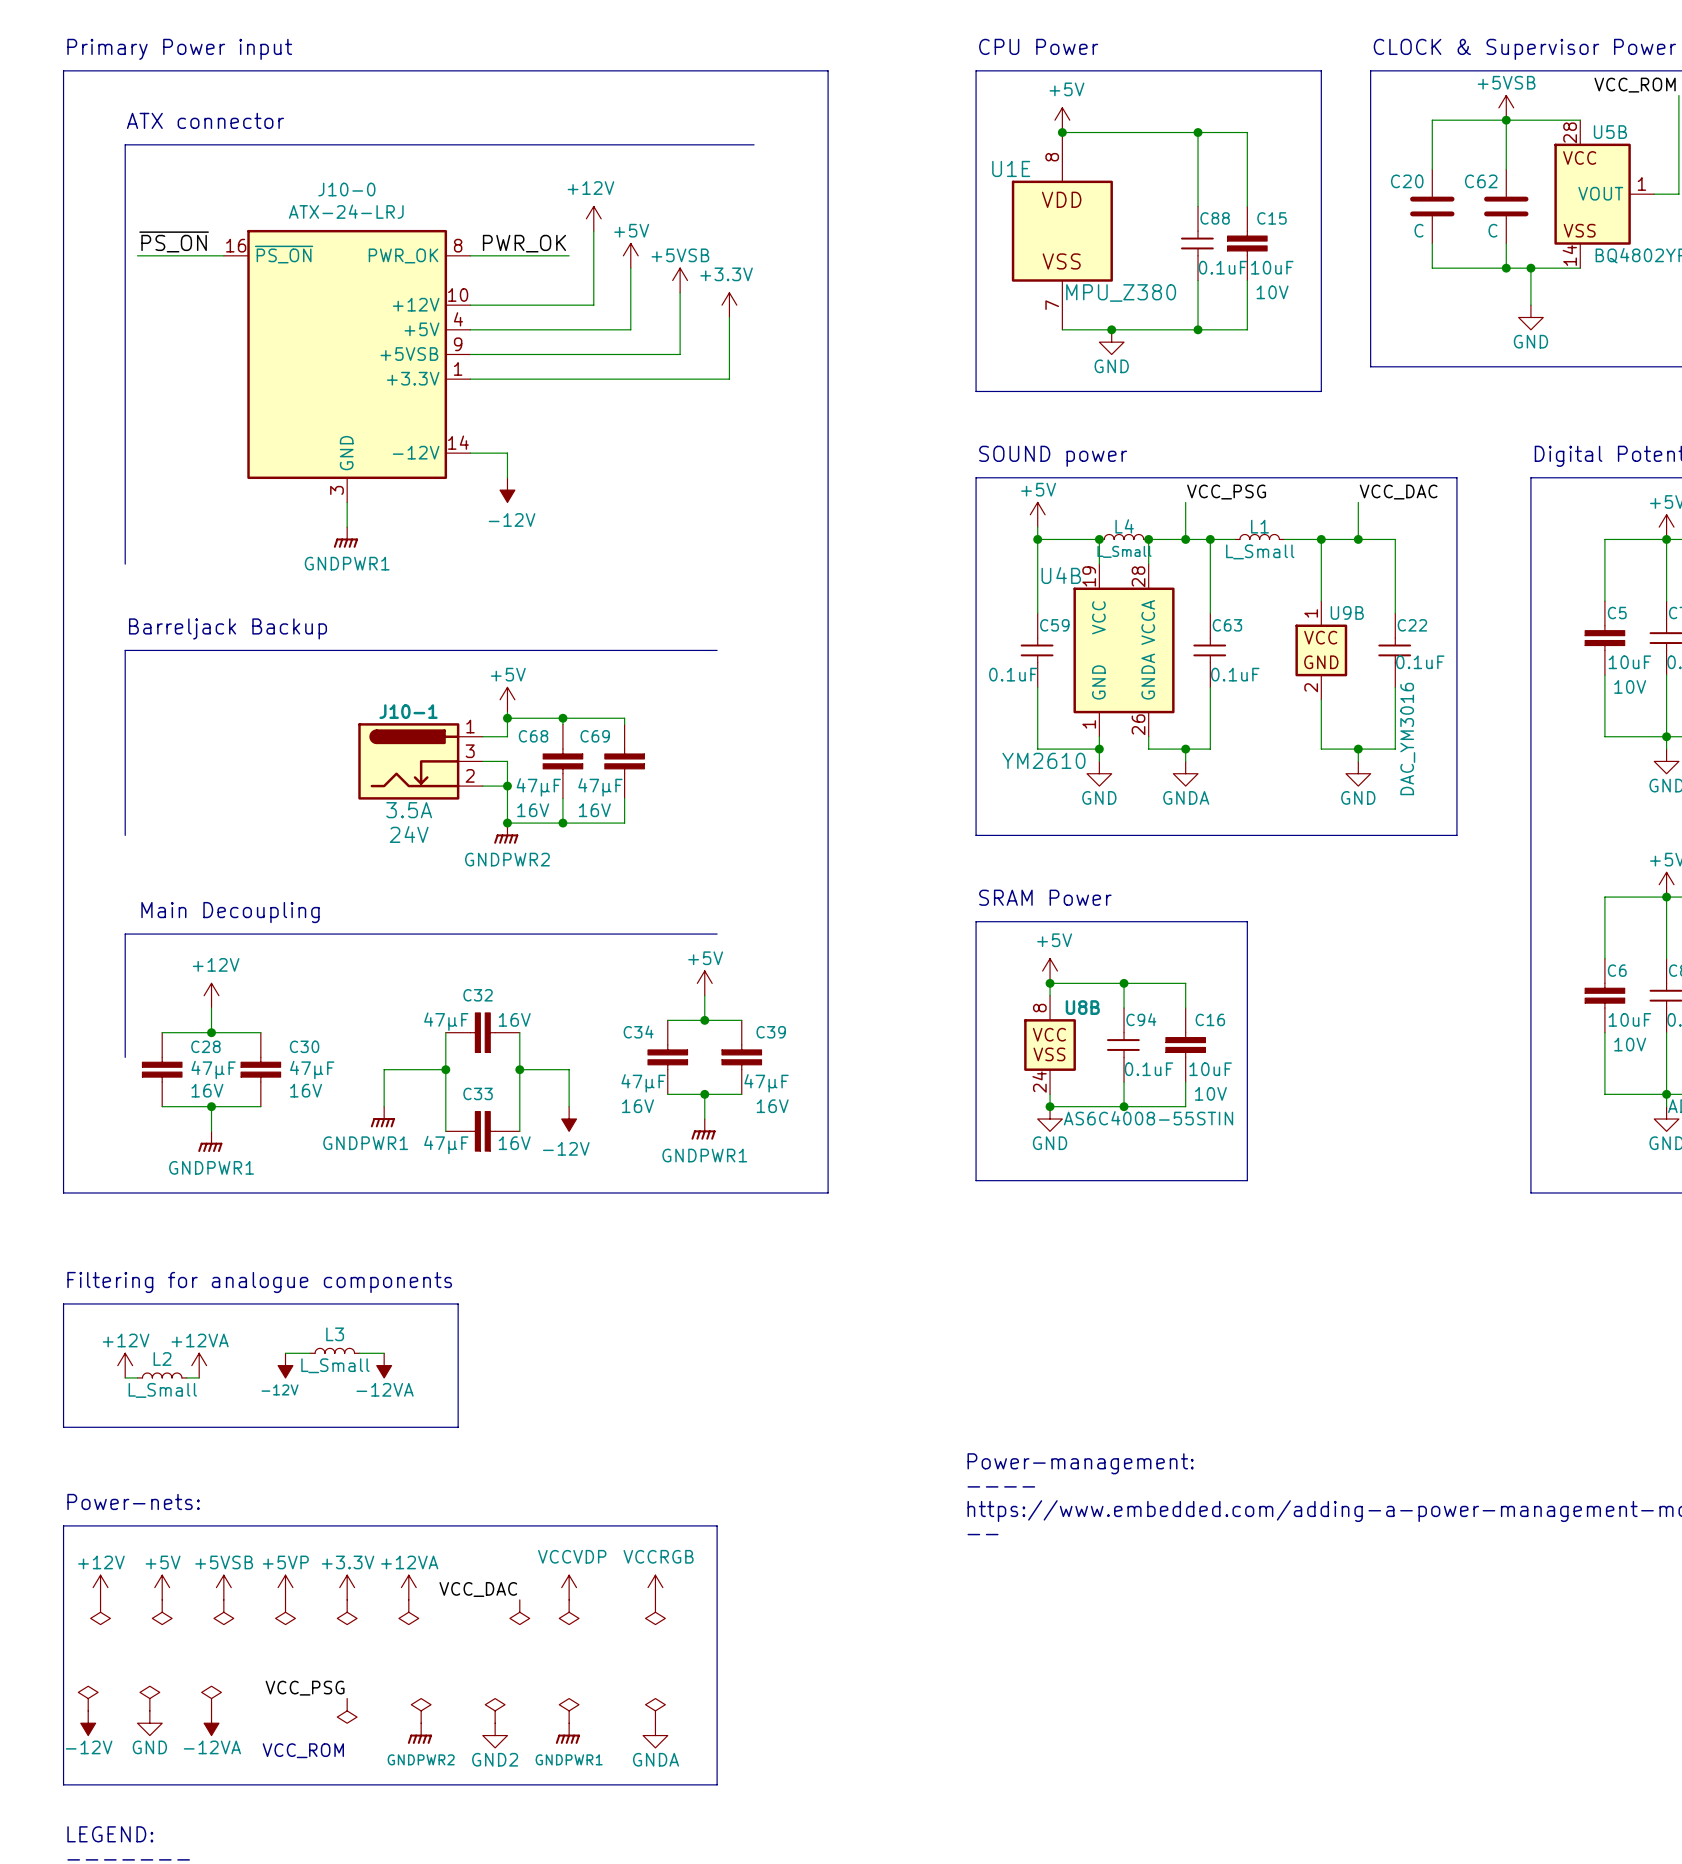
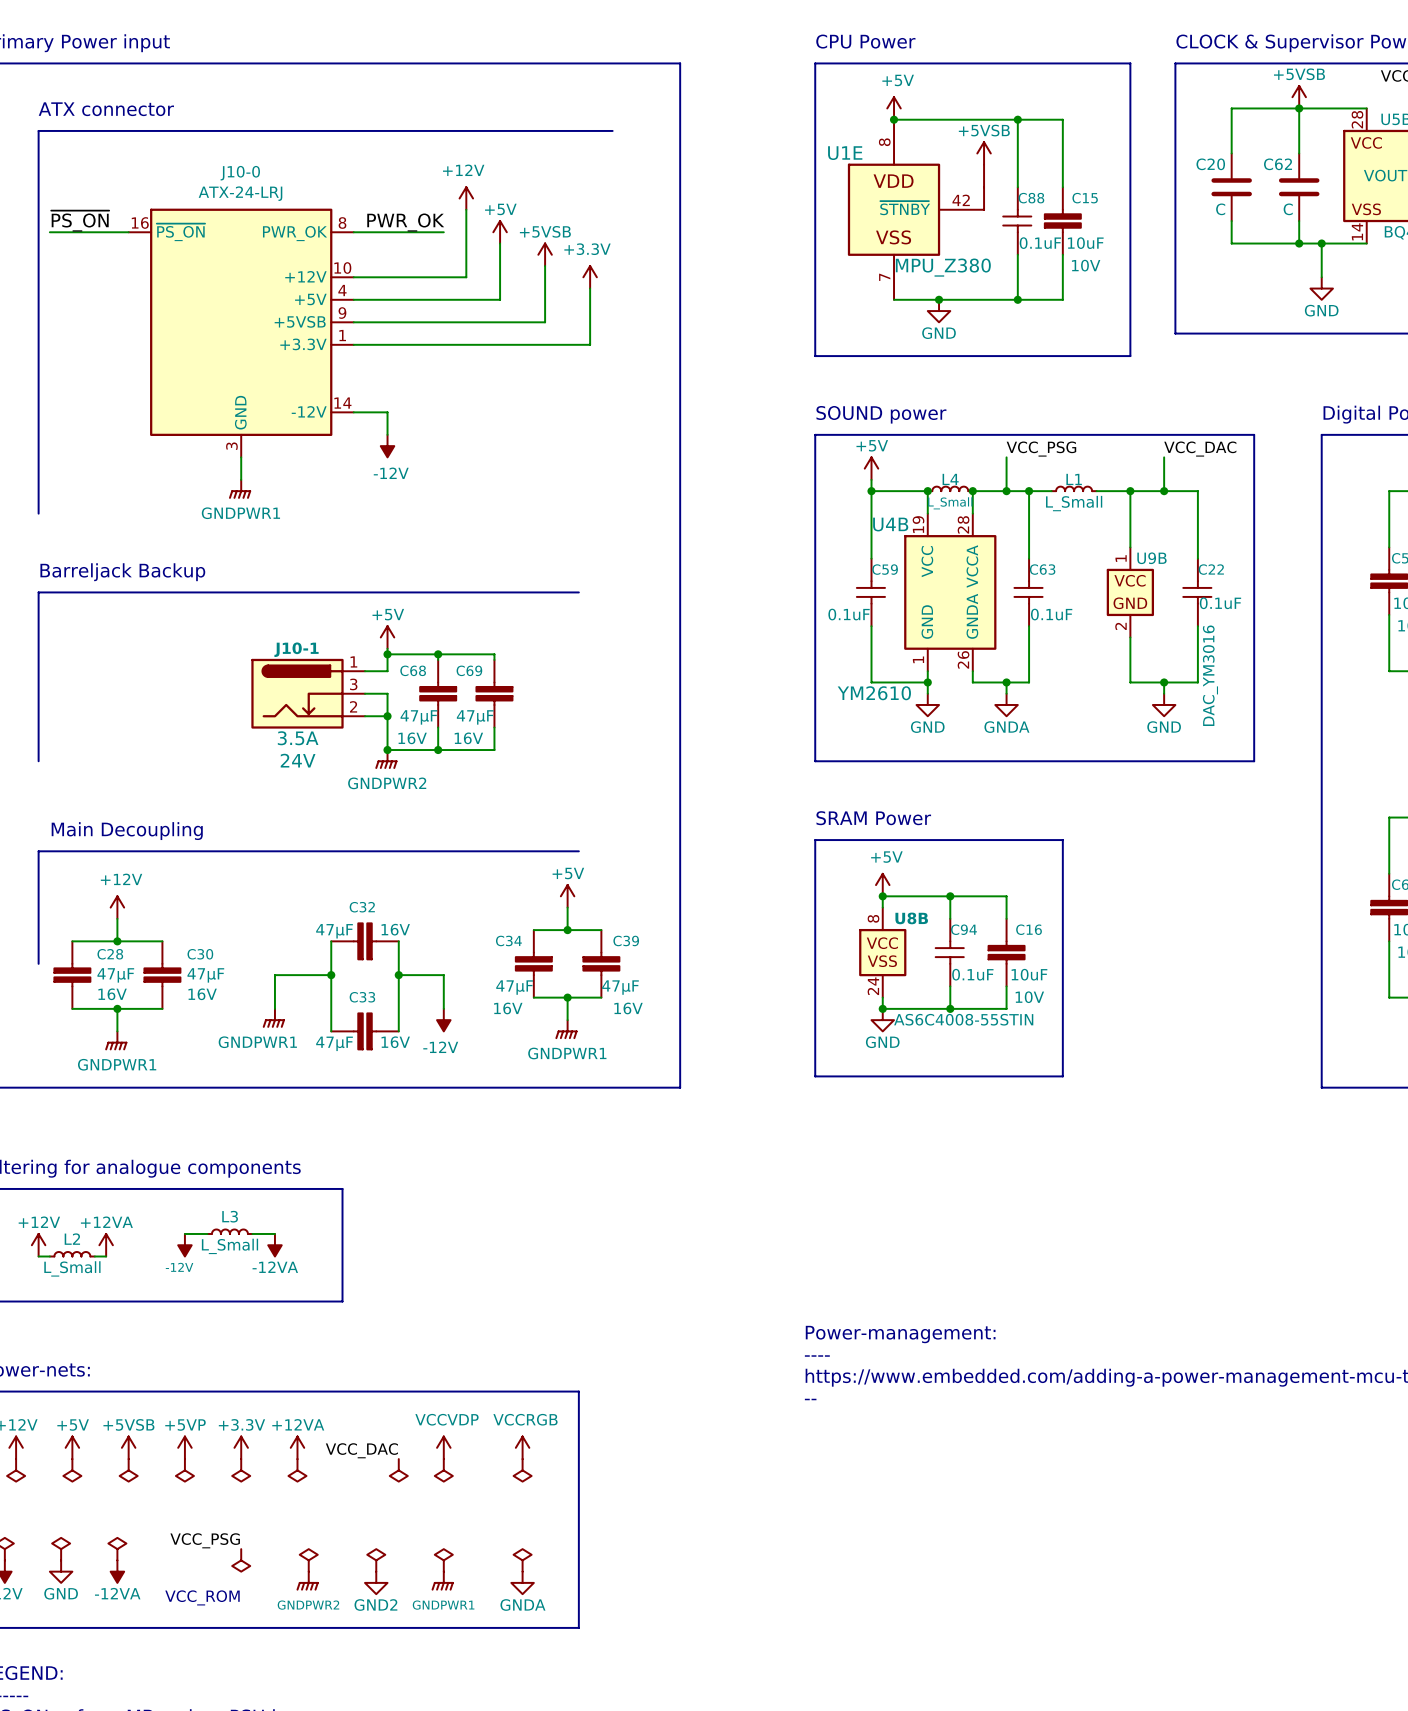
U1E symbol: [1011, 132, 1113, 330] -> [847, 119, 985, 300]
power symbol: none -> +5VSB (984, 153)
part: none -> (984, 187)

